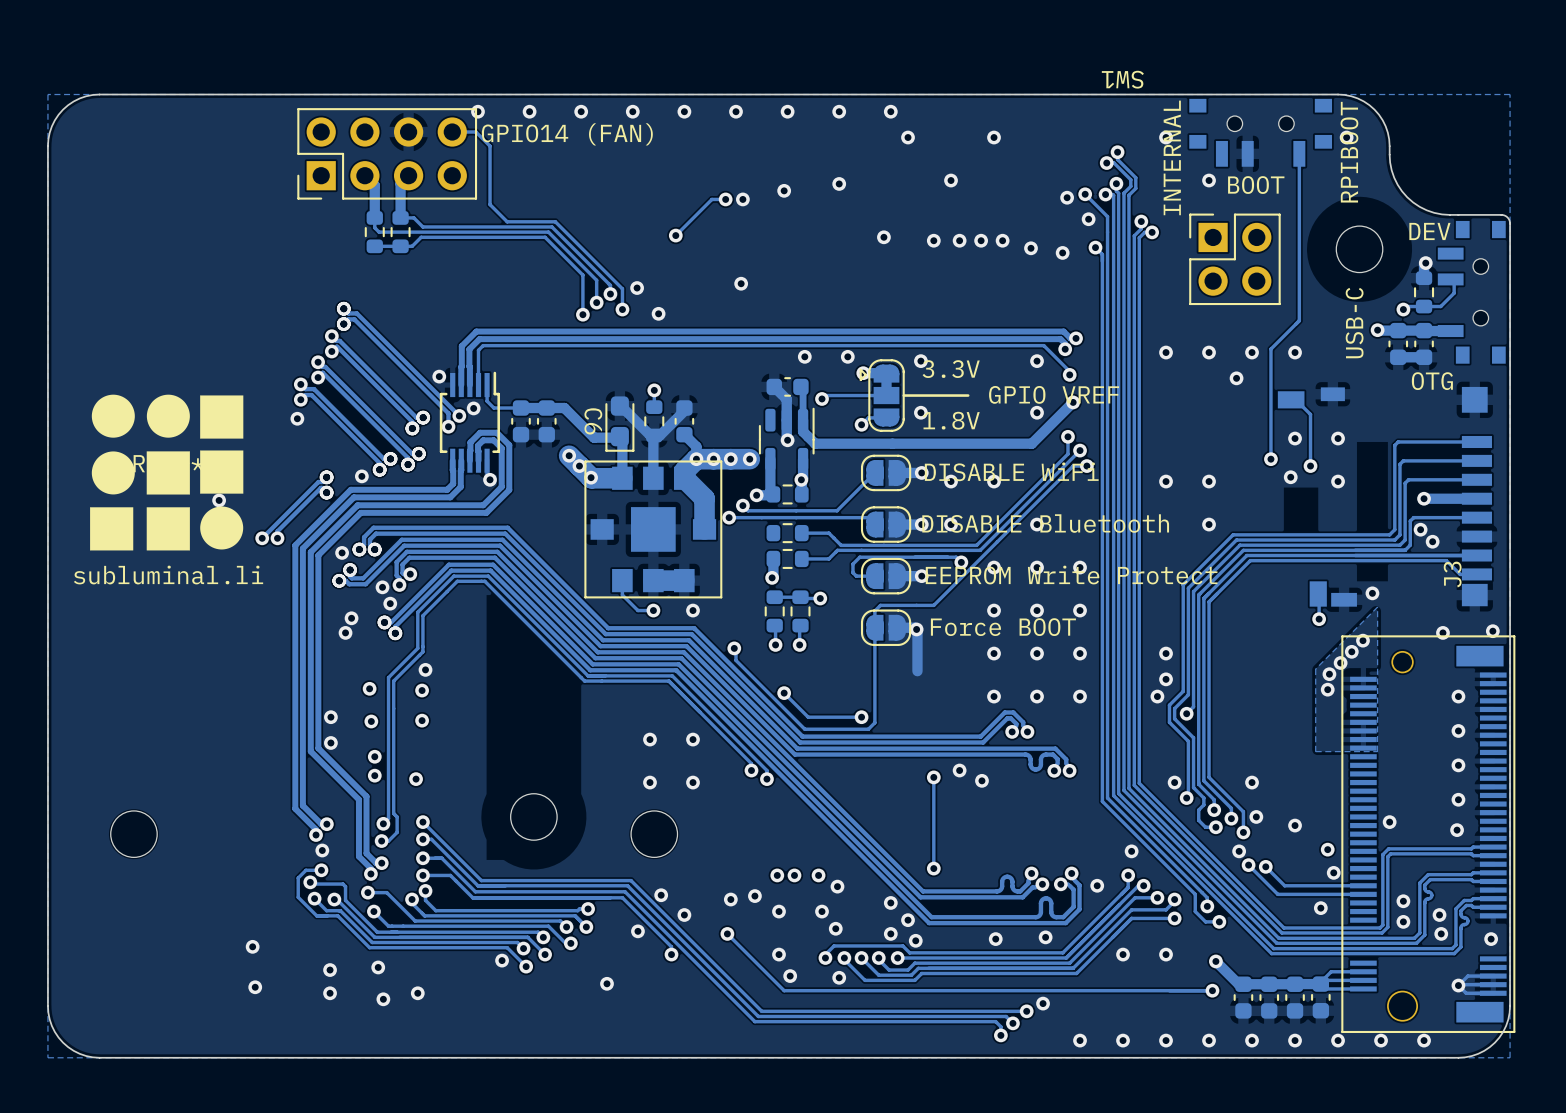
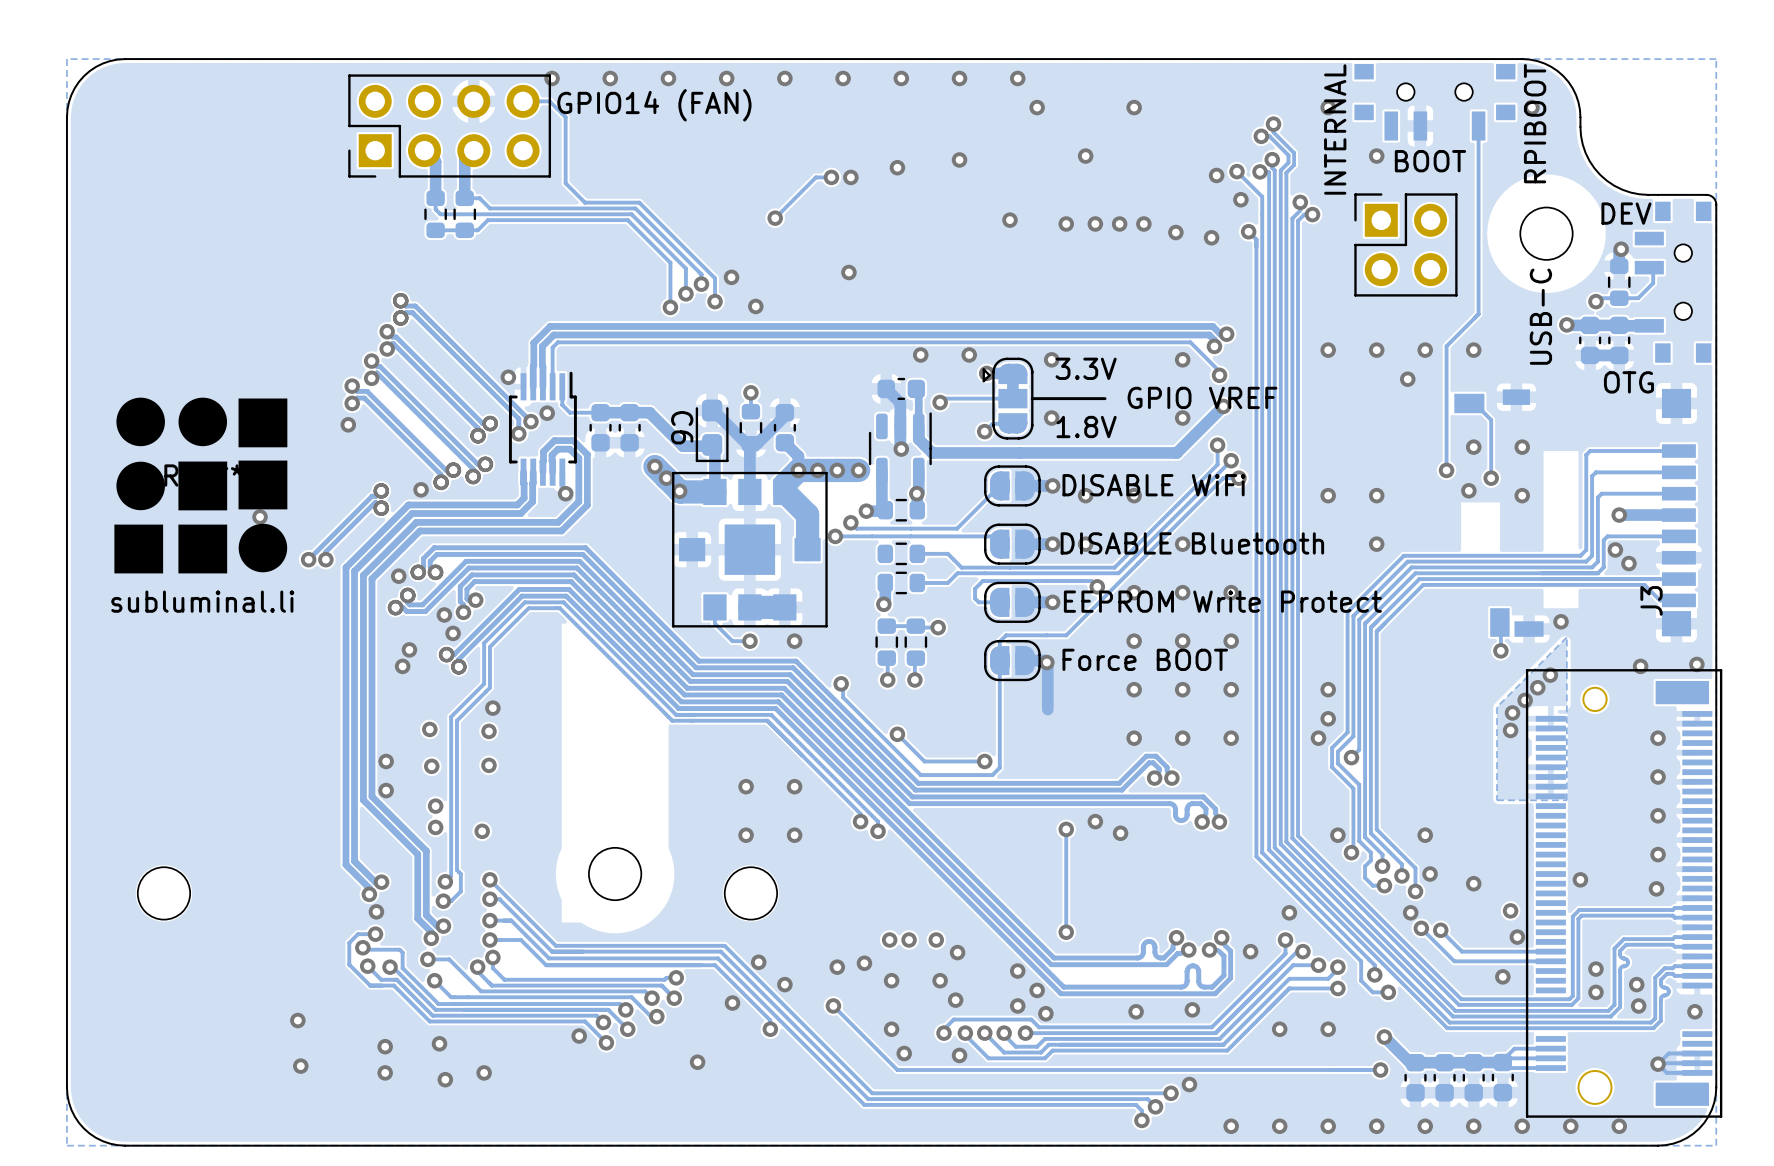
SW1 name: SW1 (1122, 79) -> none

